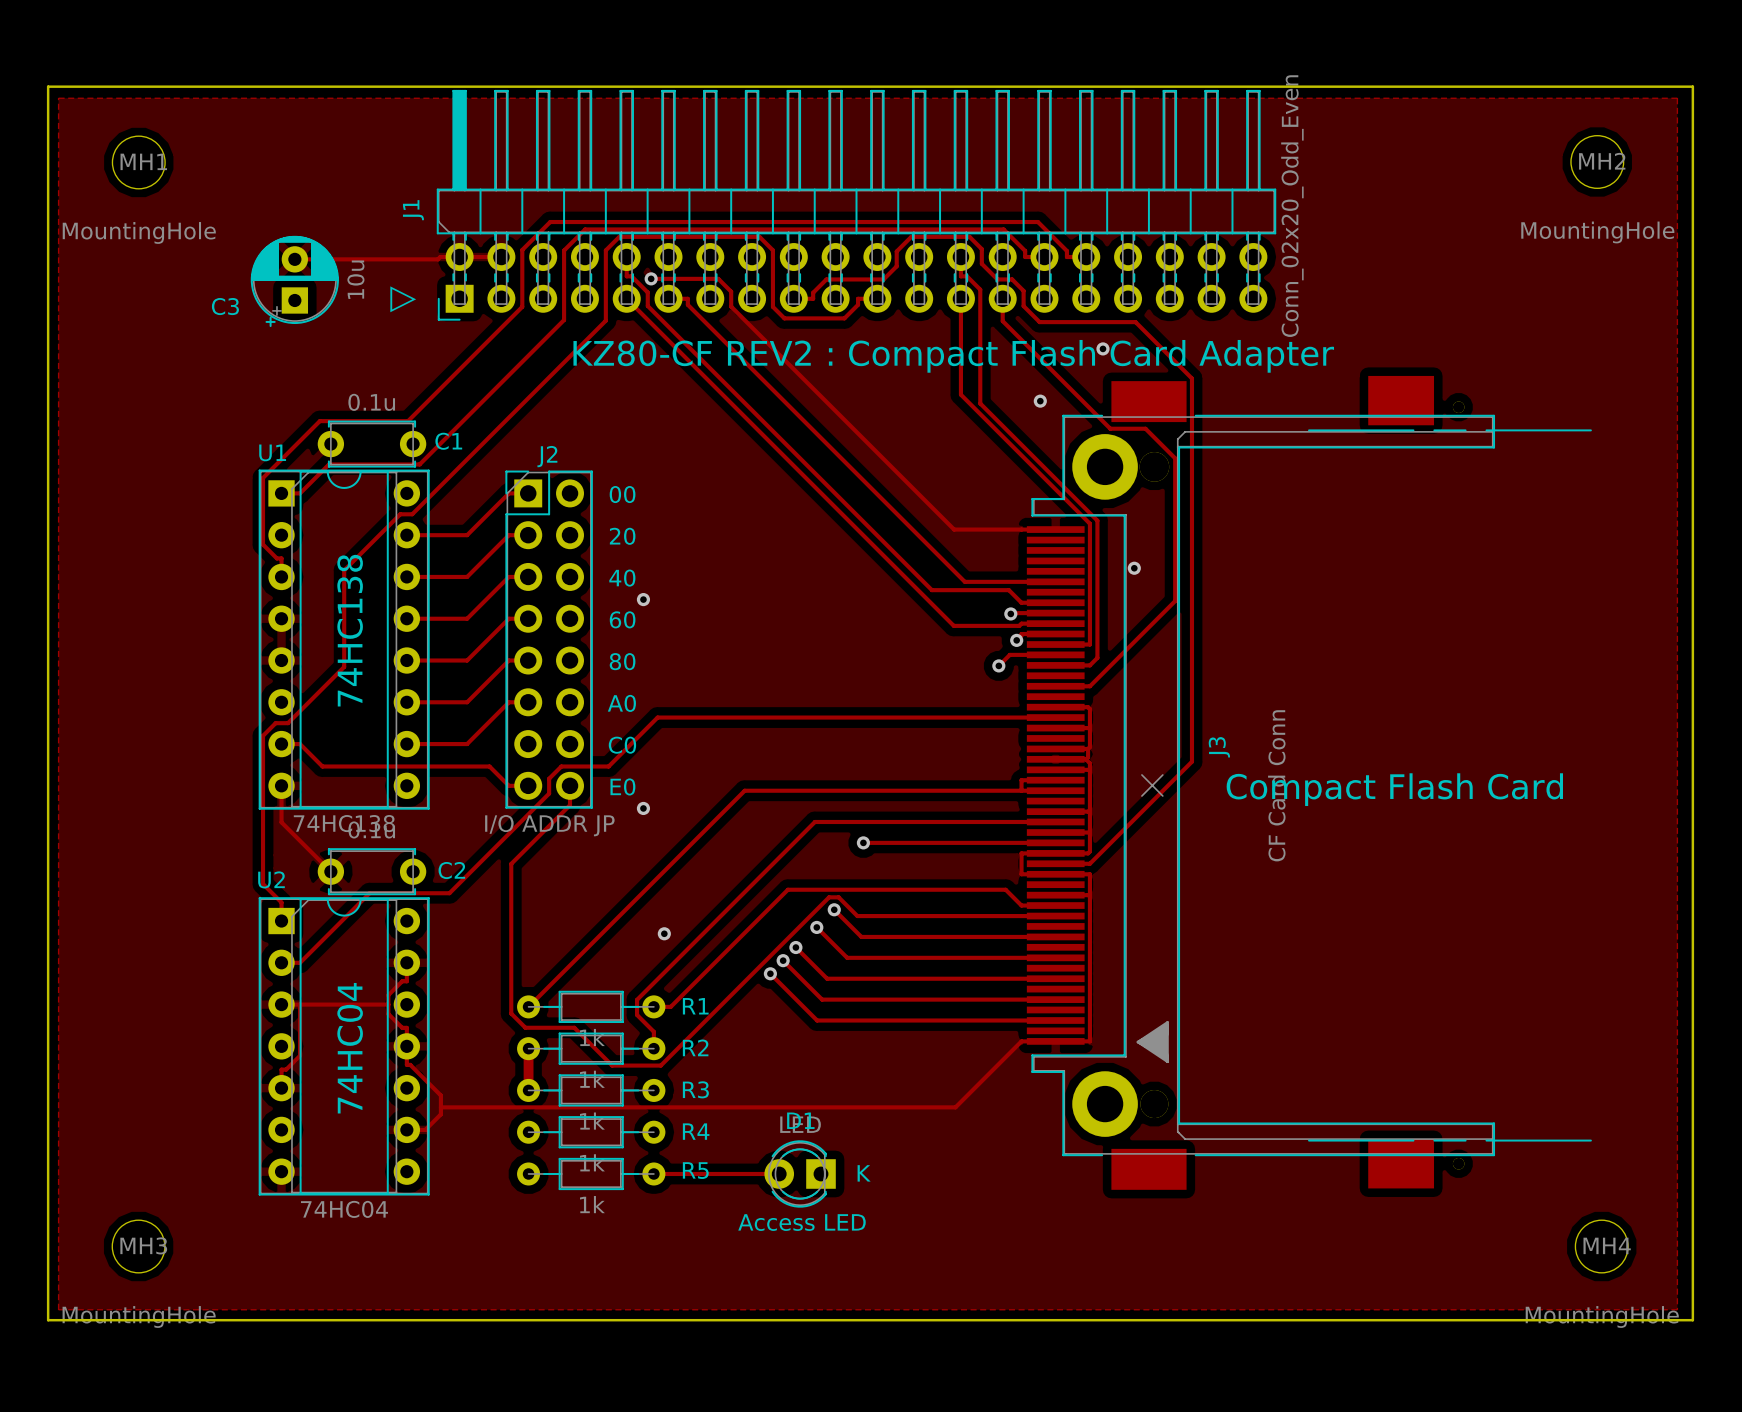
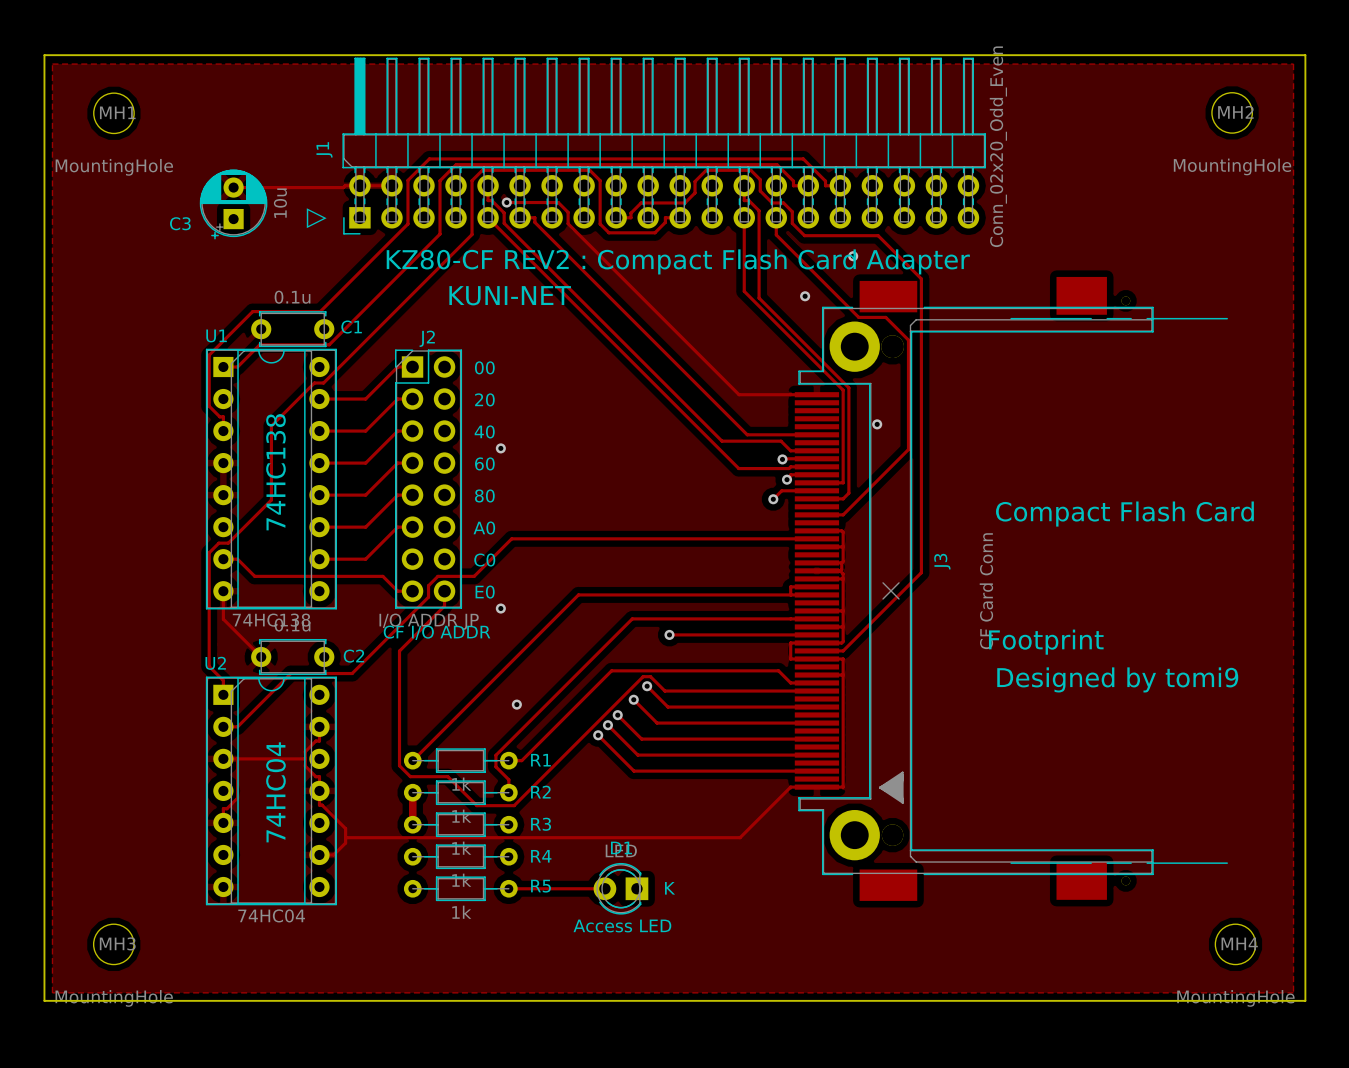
text position: KZ80-CF REV2 : Compact Flash Card Adapter (953, 356) -> KZ80-CF REV2 : Compact Flash Card Adapter (678, 261)
text: none -> KUNI-NET (510, 295)
text position: Compact Flash Card (1394, 789) -> Compact Flash Card (1124, 514)
text: none -> CF I/O ADDR (437, 632)
text: none -> Footprint (1046, 642)
text: none -> Designed by tomi9 (1117, 679)

